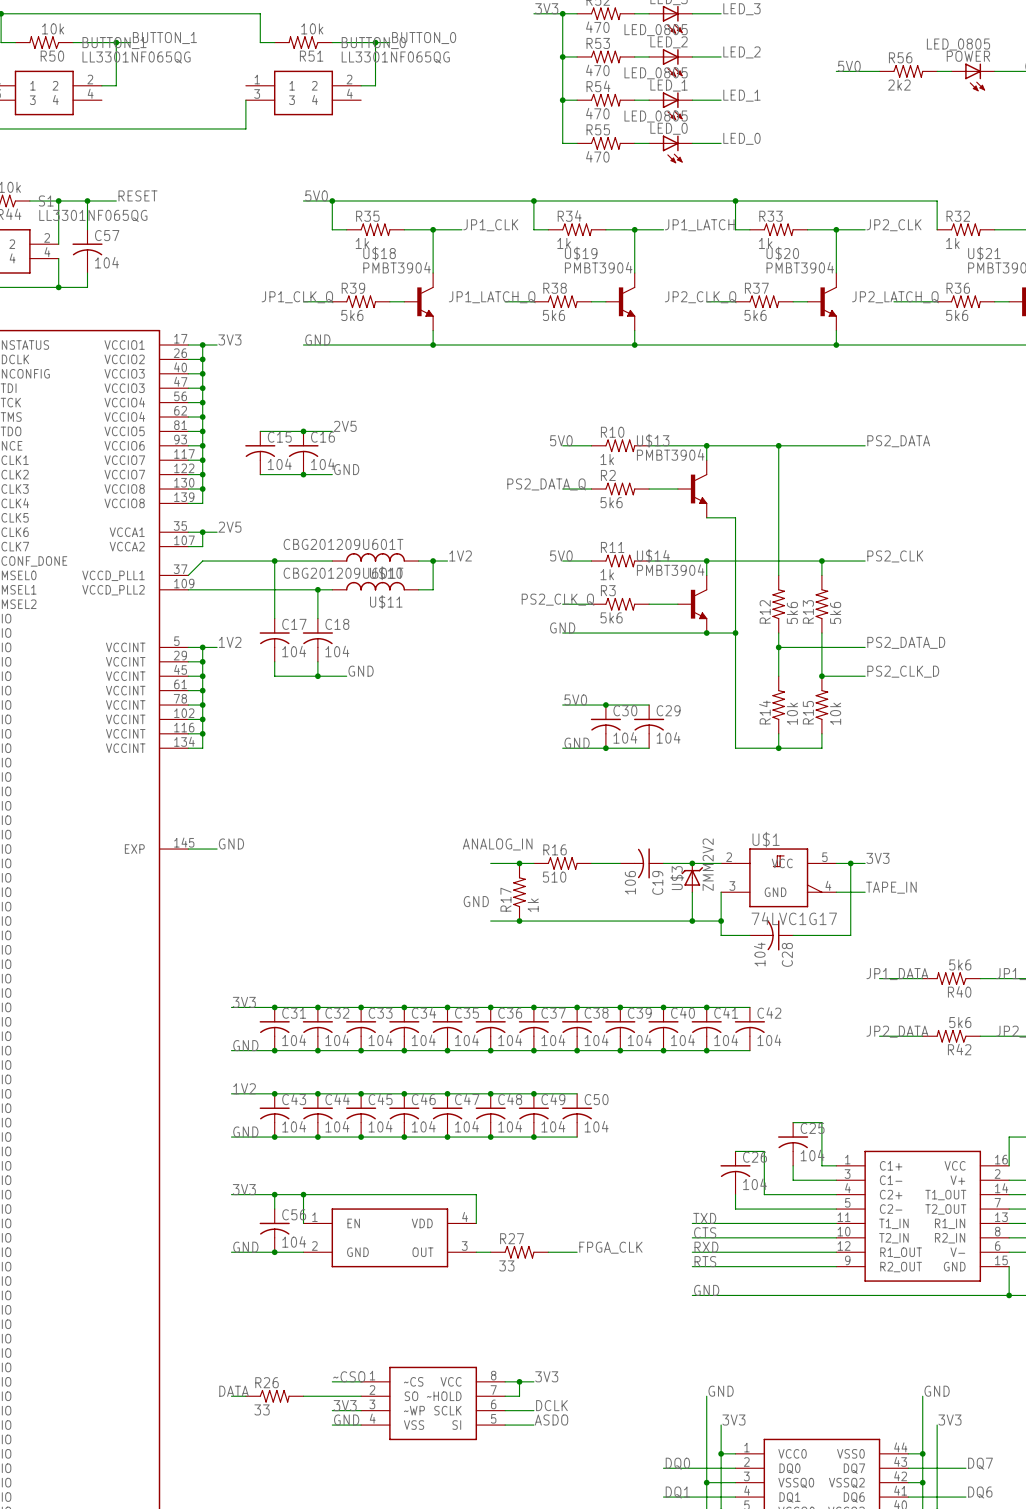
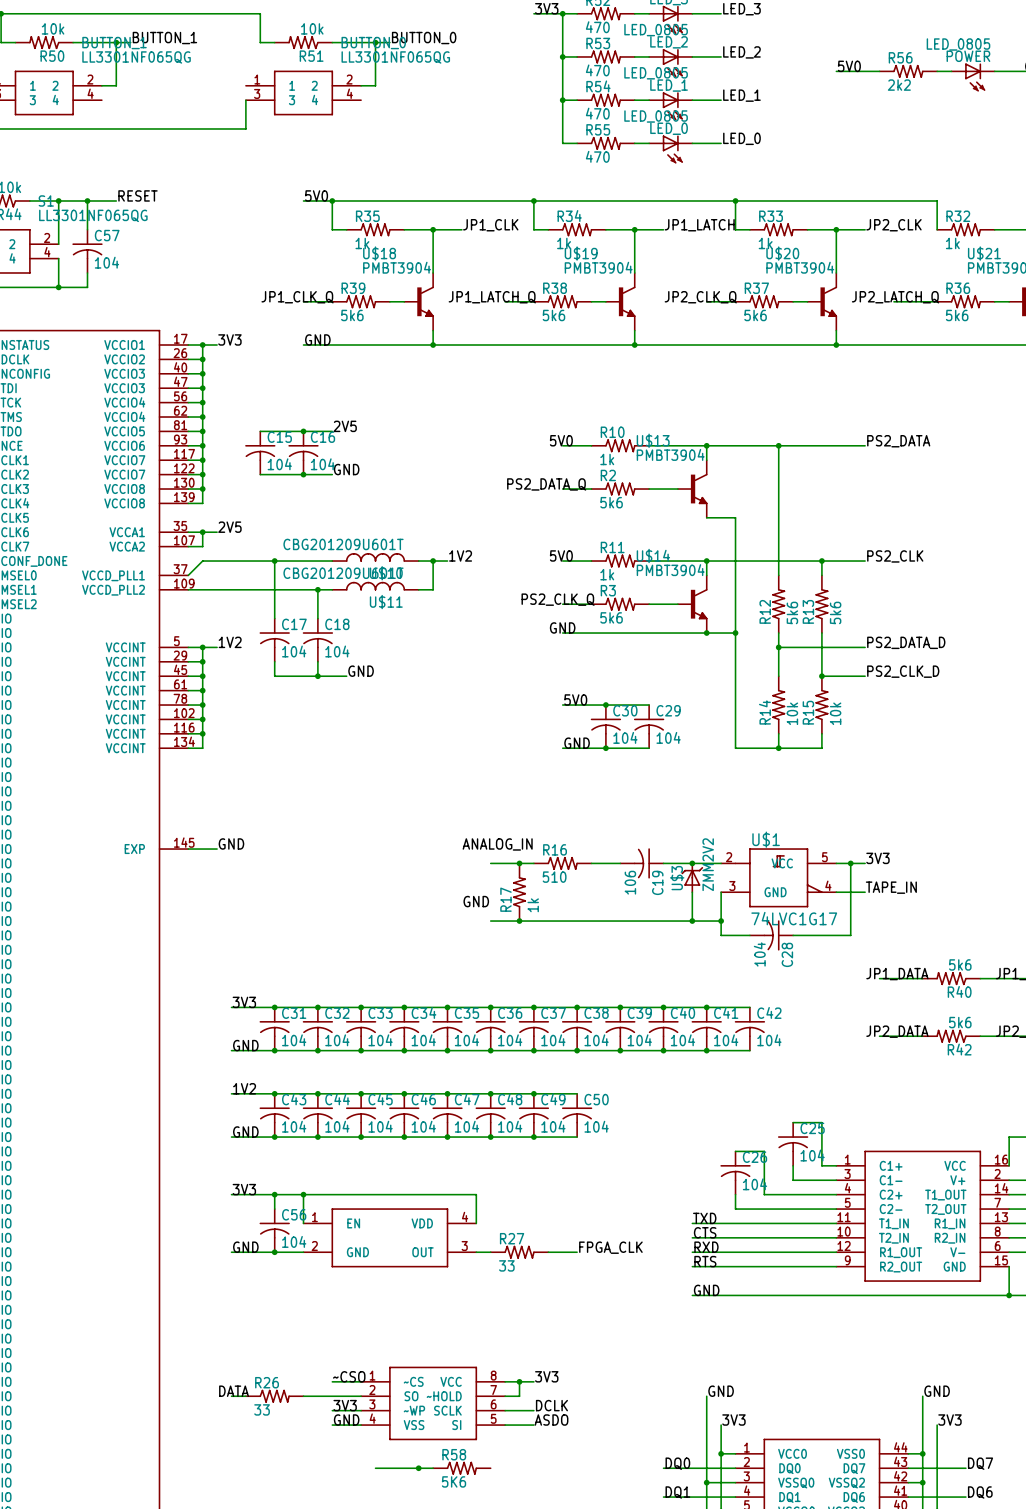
wire: none -> (375, 1468) (433, 1468)
junction: none -> (418, 1468)
R58: none -> 5K6 (461, 1468)

